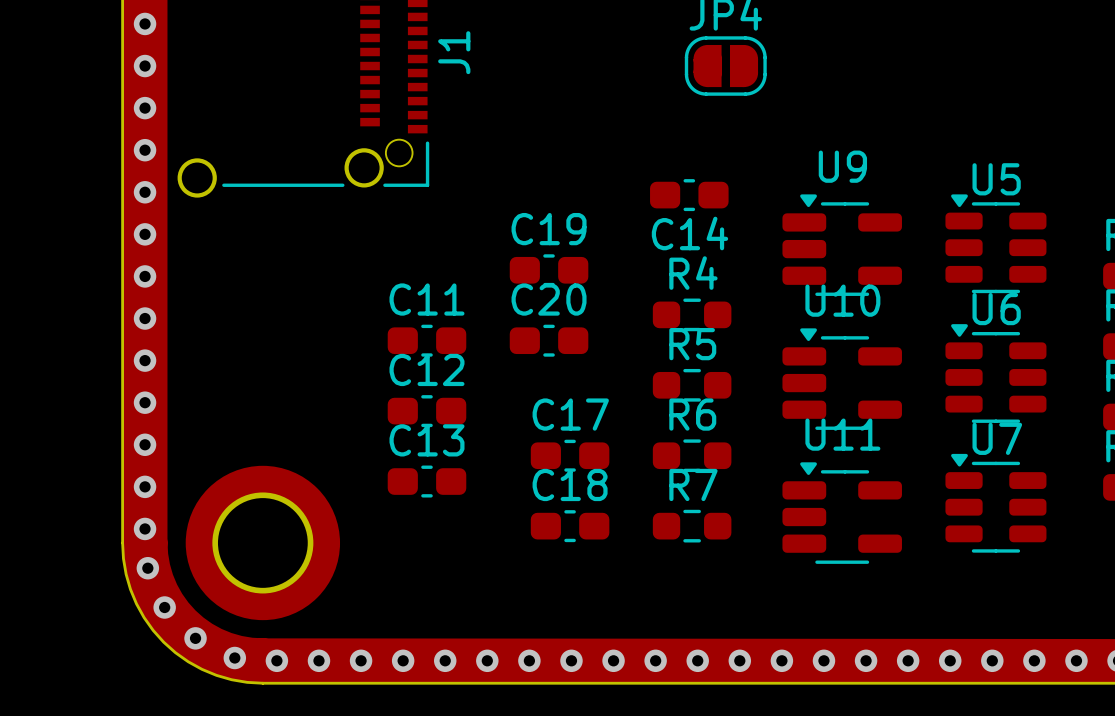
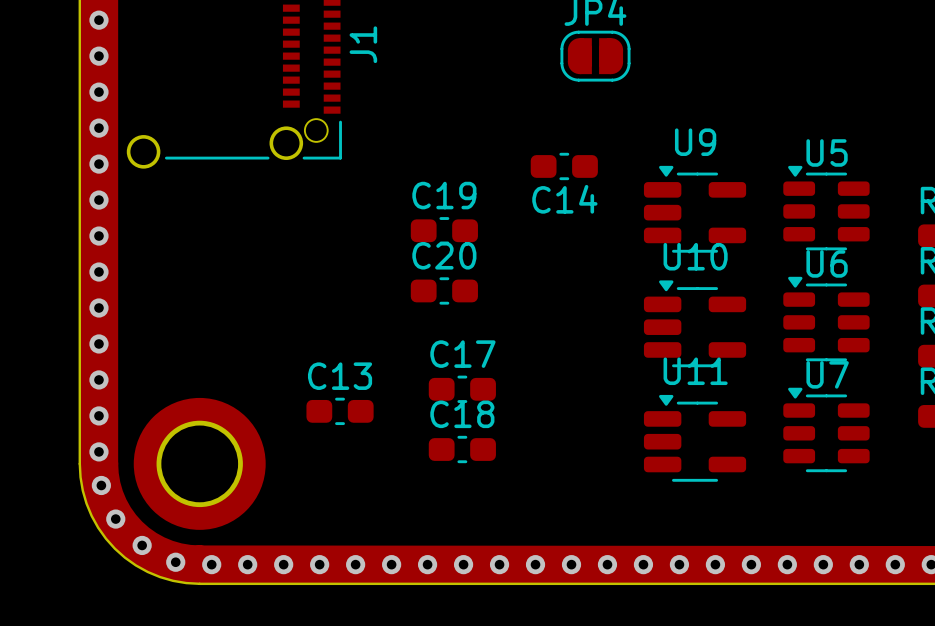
R4: (692, 314) -> none
C11: (426, 340) -> none
R5: (692, 385) -> none
C12: (426, 411) -> none
R6: (692, 455) -> none
R7: (692, 526) -> none

